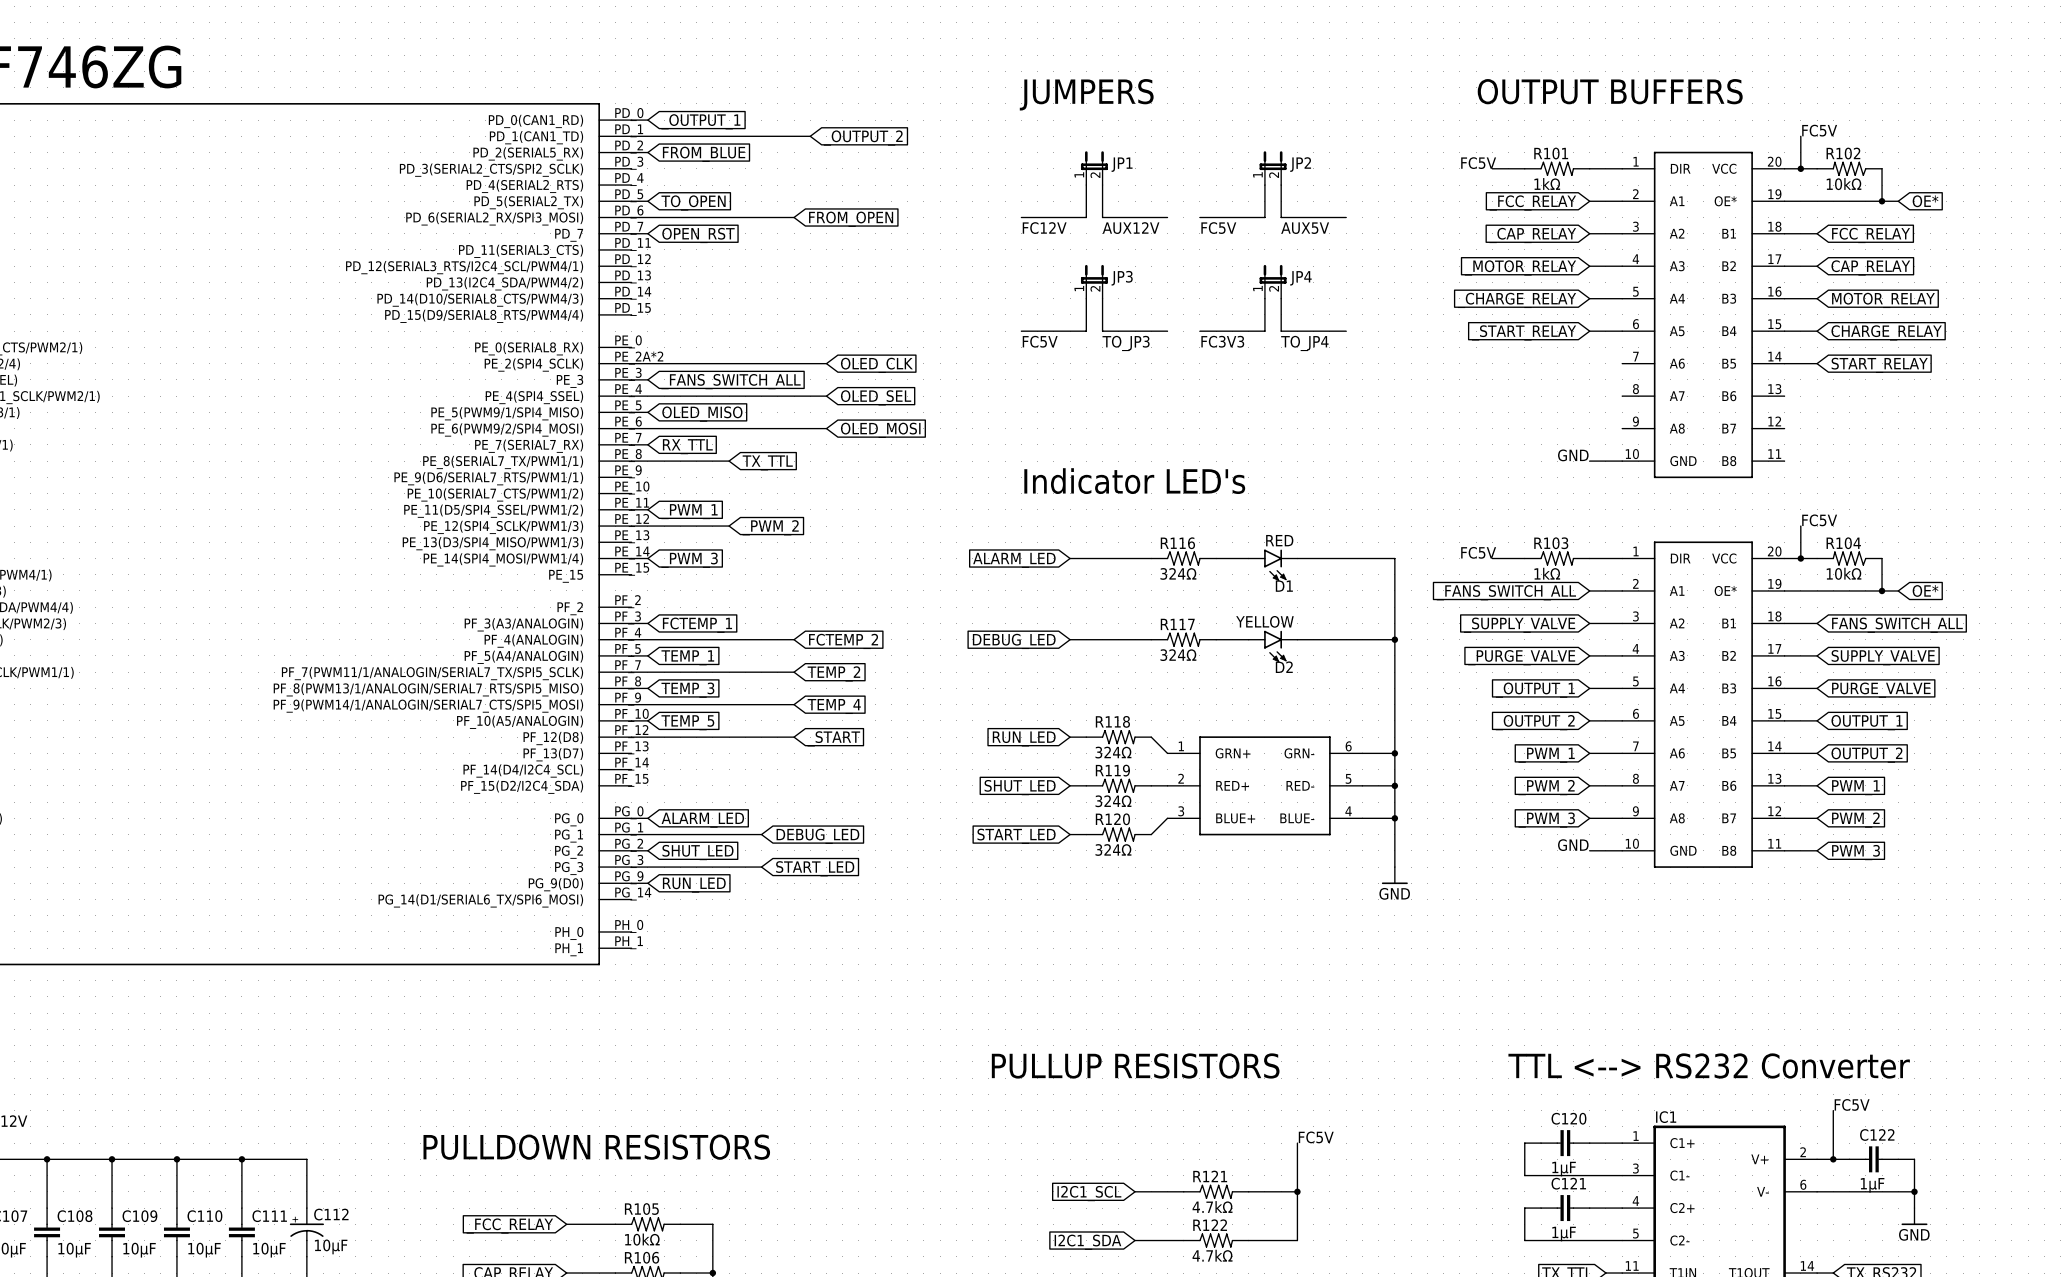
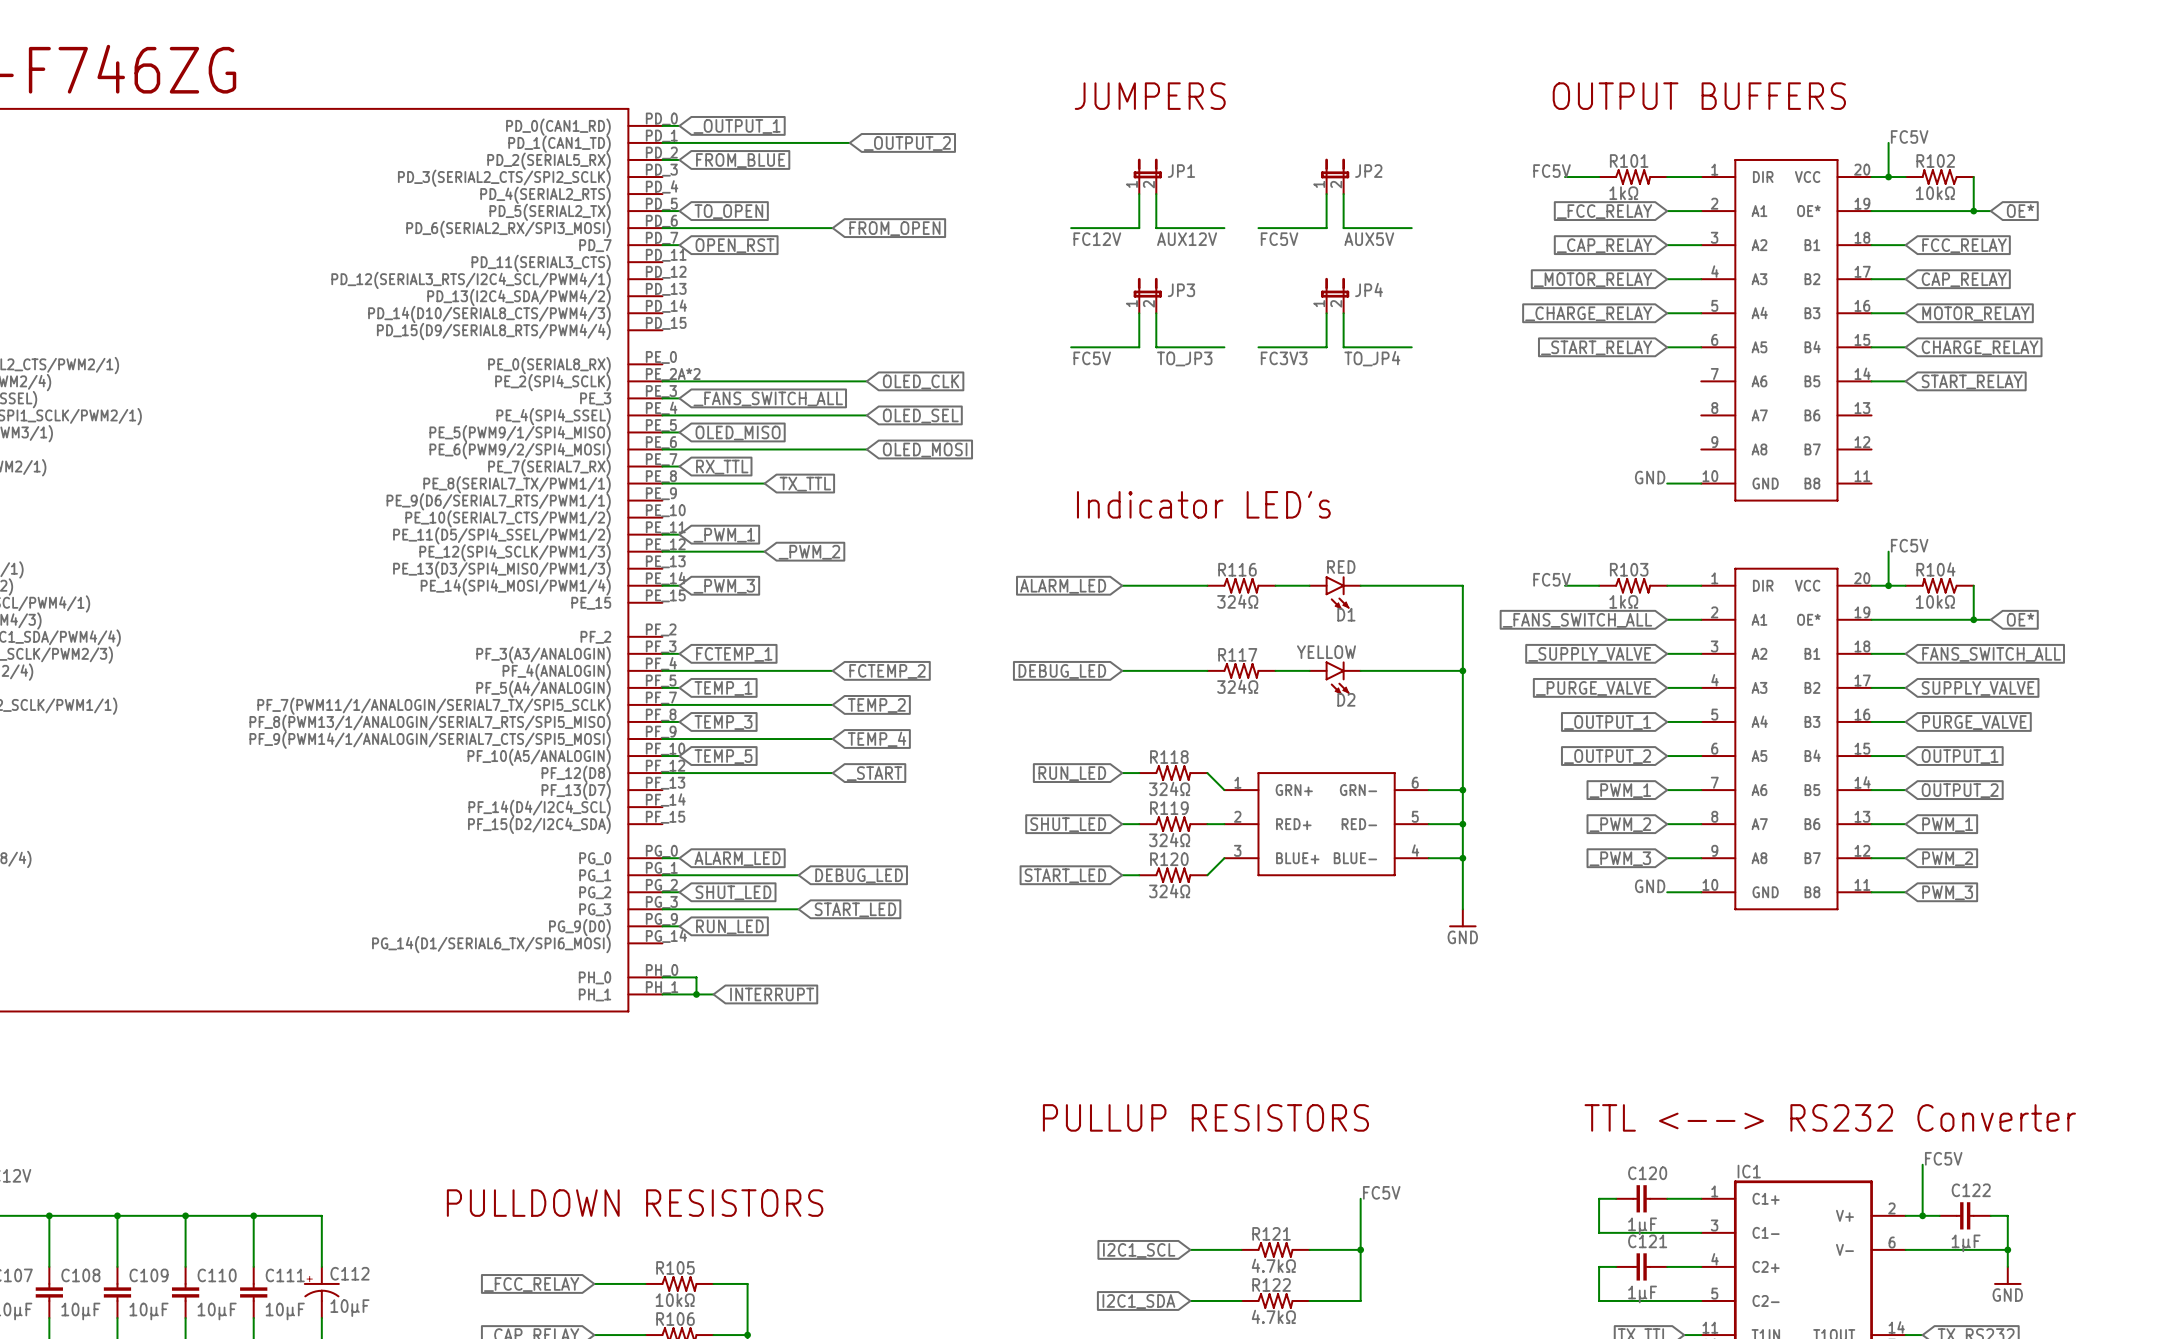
wire: none -> (662, 977) (696, 977) (696, 994)
wire: none -> (662, 994) (713, 994)
junction: none -> (696, 994)
global label: none -> INTERRUPT (772, 994)

